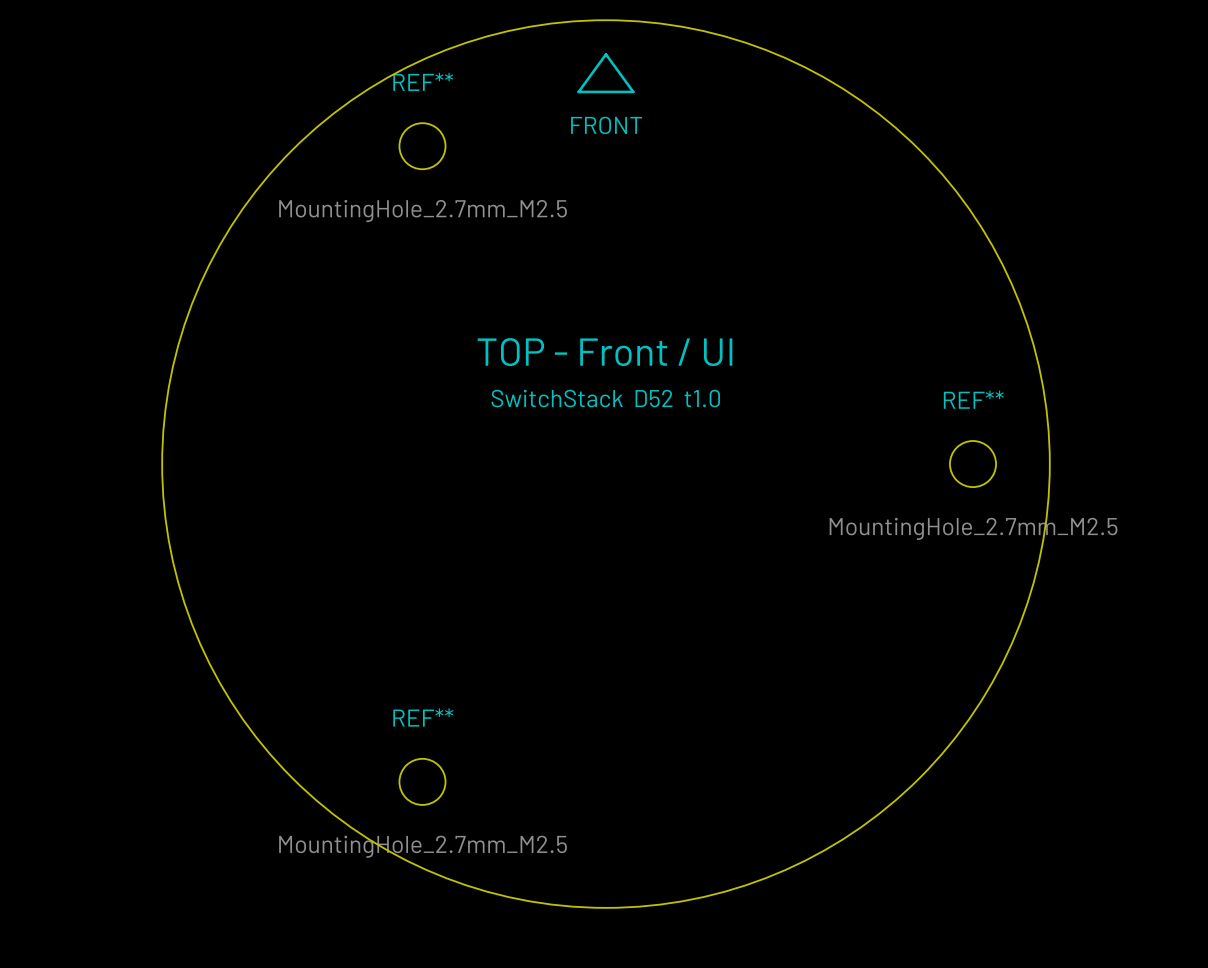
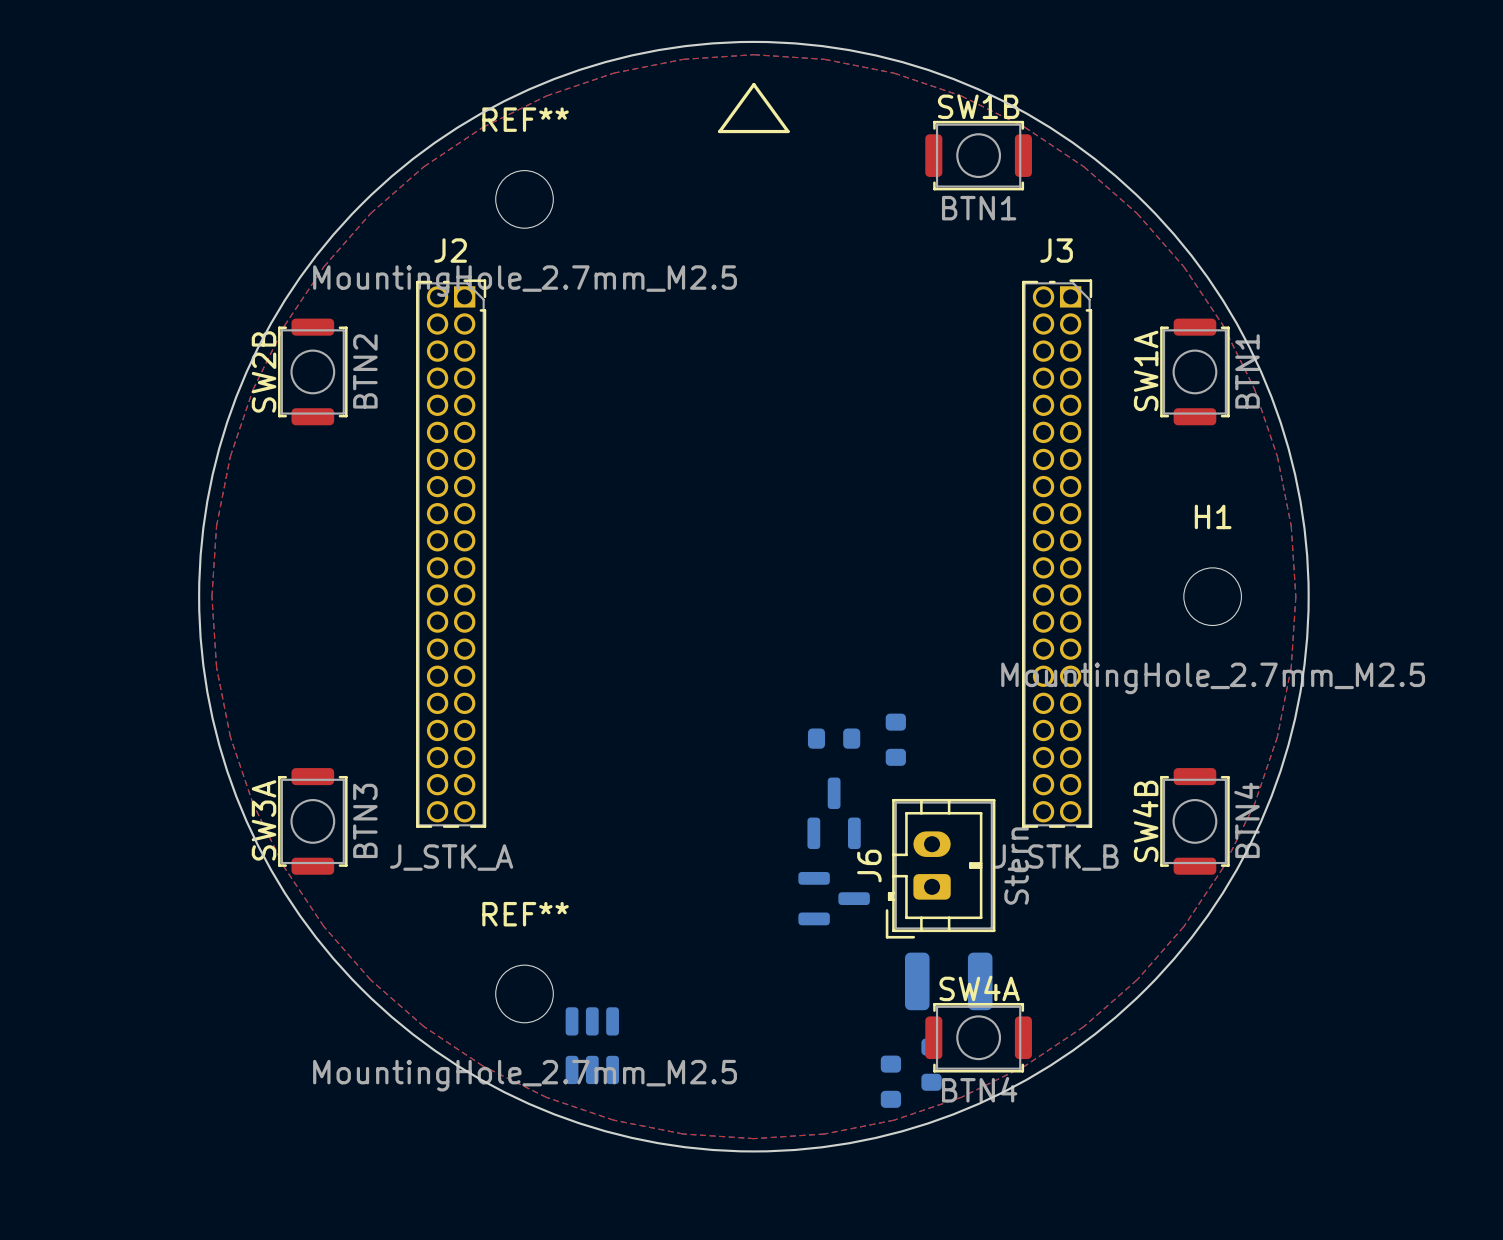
top zone outline: none -> (753, 54) (683, 59) (613, 73) (546, 95) (482, 127) (423, 166) (370, 213) (323, 266) (284, 325) (253, 389) (230, 456) (216, 525) (211, 596) (216, 667) (230, 736) (253, 804) (284, 867) (323, 926) (370, 979) (423, 1026) (482, 1066) (546, 1097) (613, 1120) (683, 1134) (753, 1138) (824, 1134) (894, 1120) (961, 1097) (1024, 1066) (1083, 1026) (1137, 979) (1183, 926) (1223, 867) (1254, 804) (1277, 736) (1291, 667) (1295, 596) (1291, 525) (1277, 456) (1254, 389) (1223, 325) (1183, 266) (1137, 213) (1083, 166) (1024, 127) (961, 95) (894, 73) (824, 59) (753, 54)
SW1B: none -> BTN1 (978, 155)
text: FRONT (606, 125) -> none
SW2B: none -> BTN2 (312, 371)
SW1A: none -> BTN1 (1194, 371)
text: TOP - Front / UI (604, 352) -> none
text: SwitchStack D52 t1.0 (605, 398) -> none
REF** name: REF** (973, 399) -> H1 (1213, 516)
J2: none -> J_STK_A (451, 553)
J3: none -> J_STK_B (1057, 553)
part: none -> (834, 738)
part: none -> (895, 739)
part: none -> (834, 813)
SW3A: none -> BTN3 (312, 821)
SW4B: none -> BTN4 (1194, 821)
J6: none -> Stern (940, 868)
part: none -> (834, 898)
part: none -> (948, 981)
SW4A: none -> BTN4 (978, 1037)
part: none -> (592, 1045)
part: none -> (931, 1064)
part: none -> (890, 1081)

